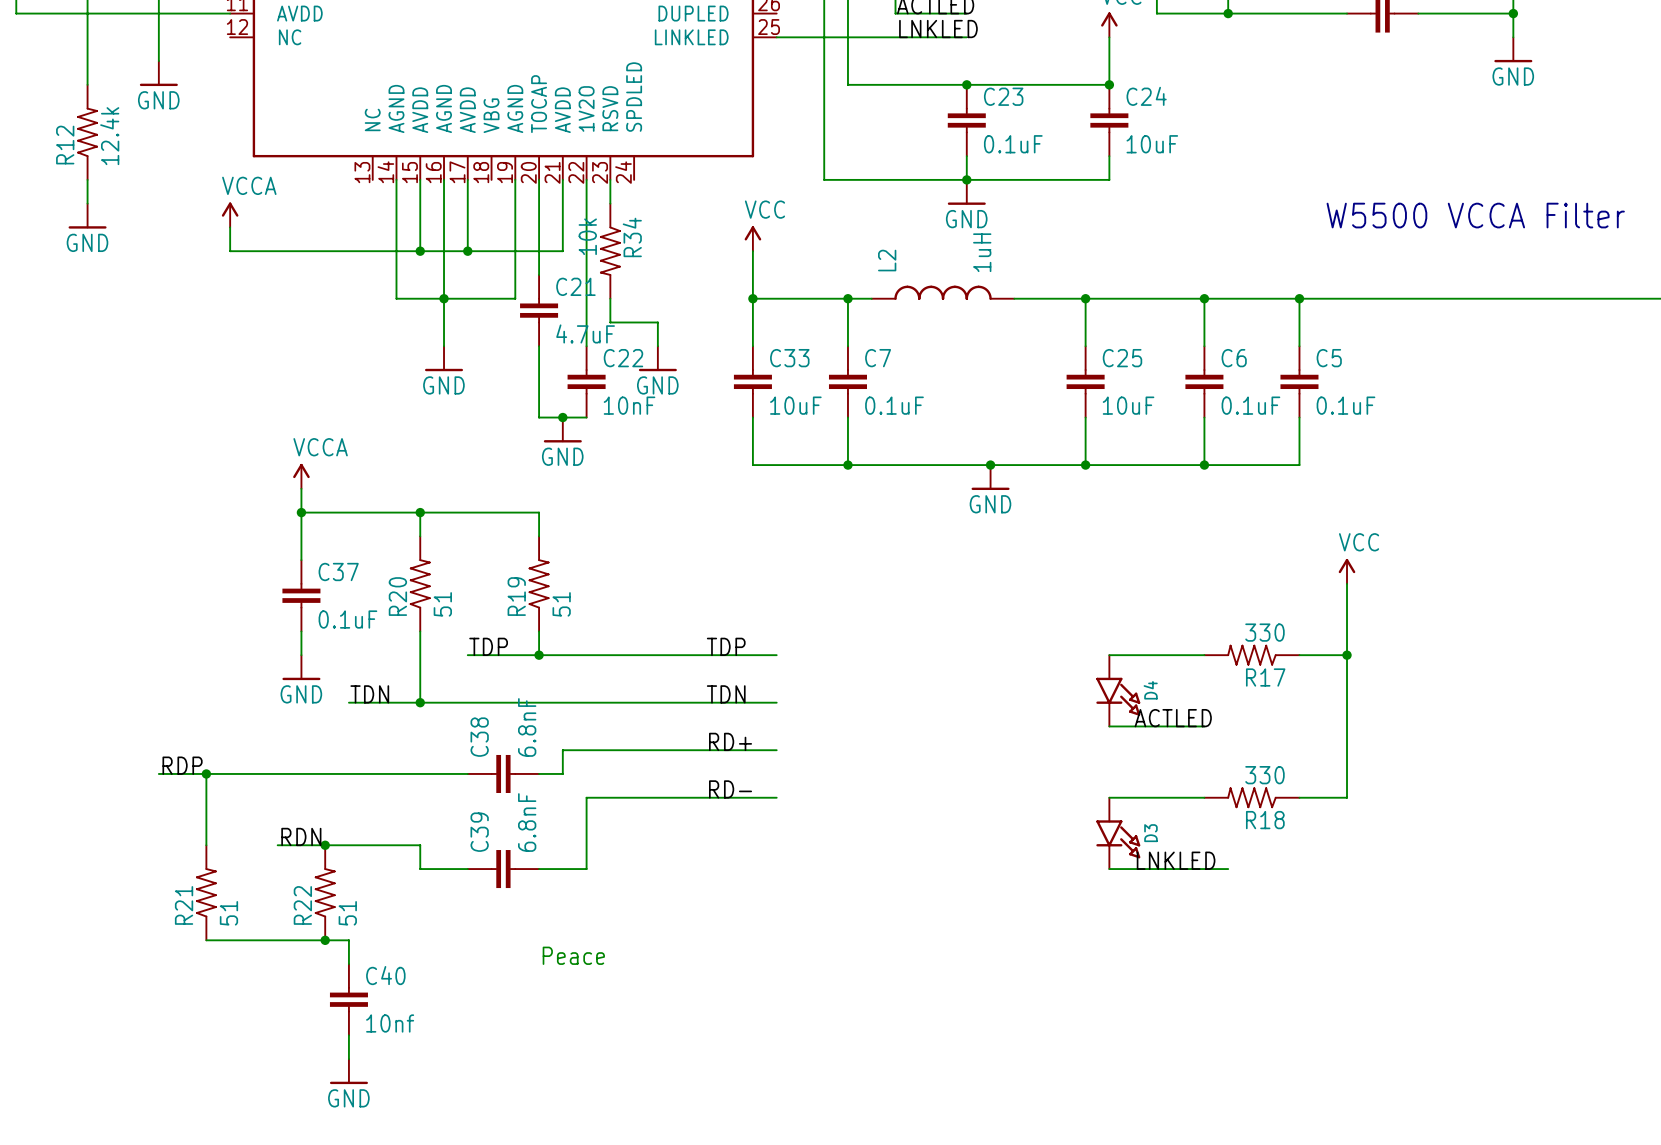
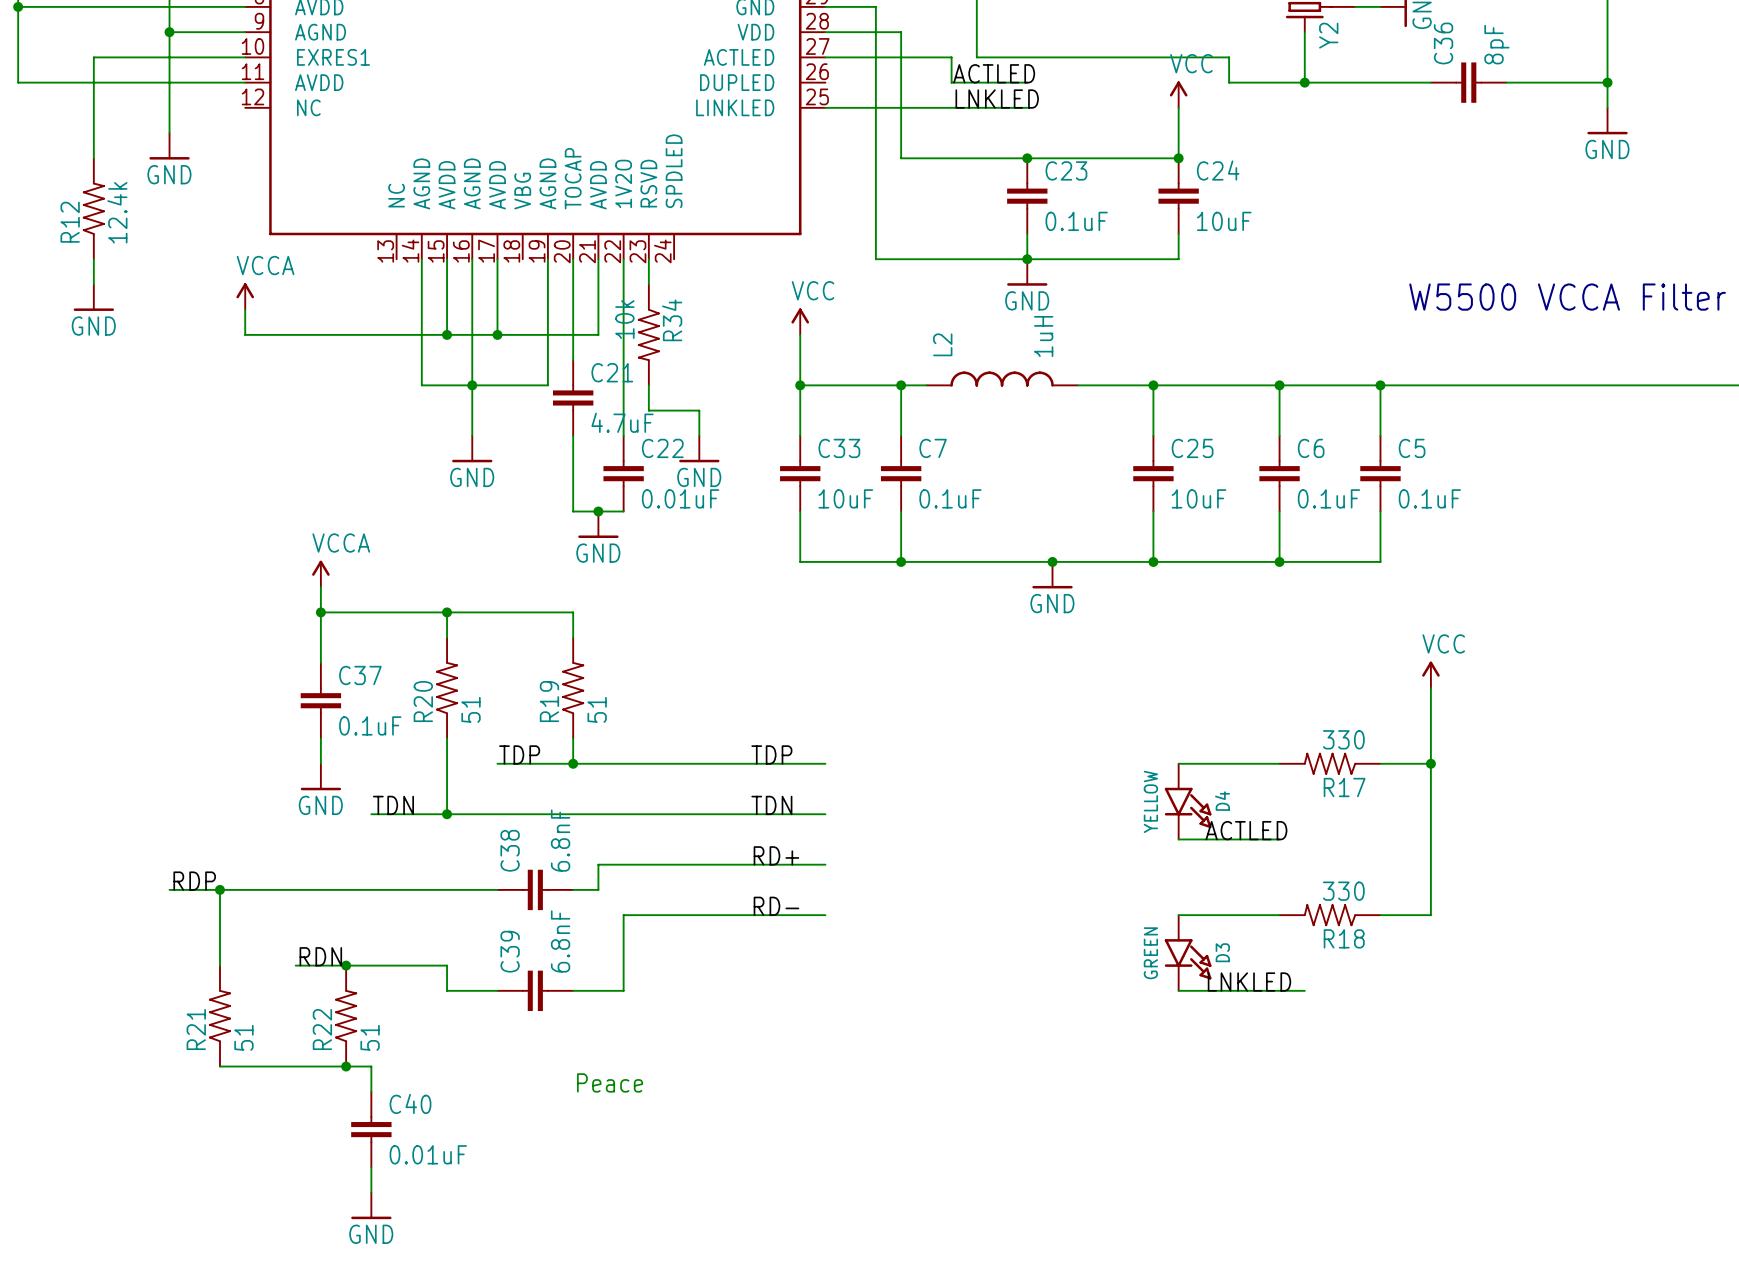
C22 value: 10nF (629, 405) -> 0.01uF (680, 498)
D4 value: none -> YELLOW (1150, 801)
D3 value: none -> GREEN (1150, 953)
C40 value: 10nf (390, 1023) -> 0.01uF (428, 1154)

